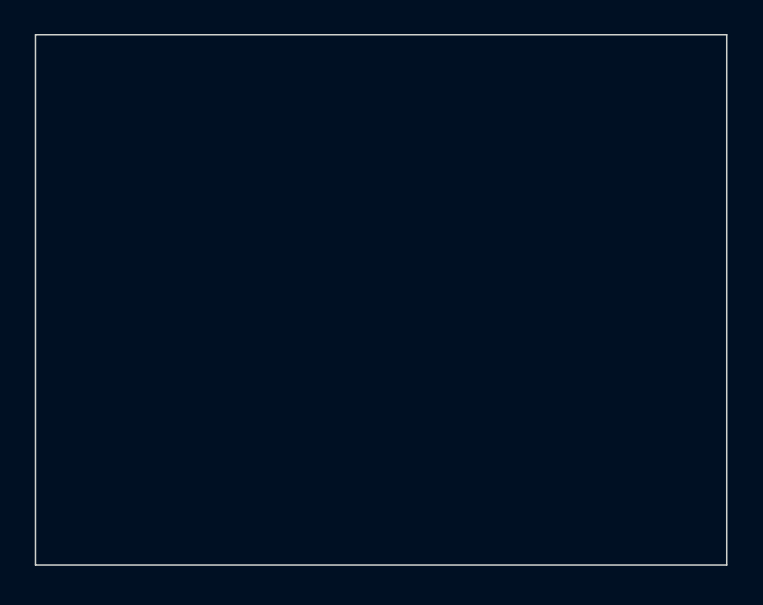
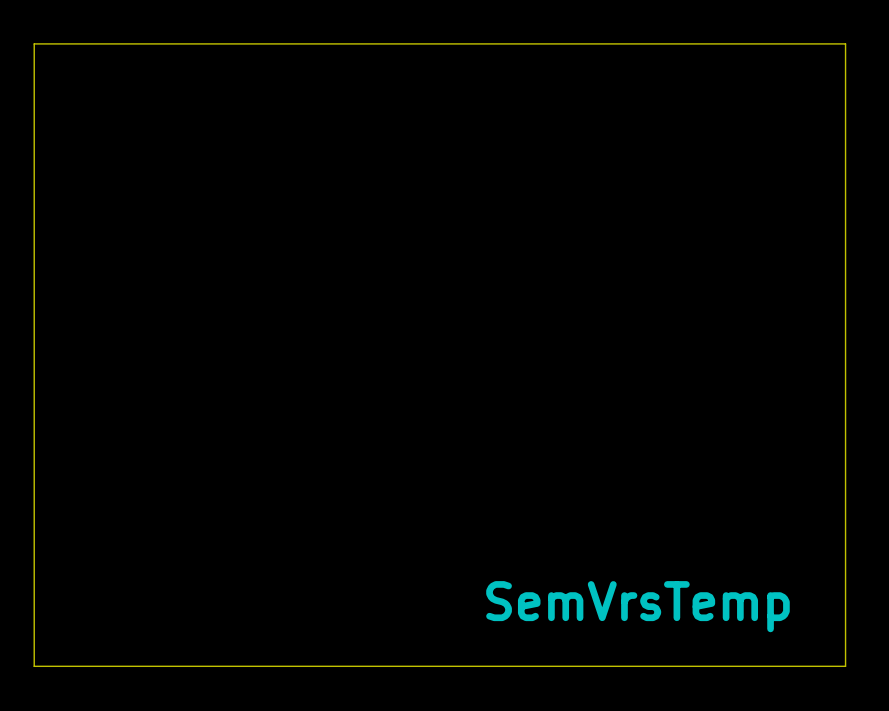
text: none -> SemVrsTemp (637, 606)

